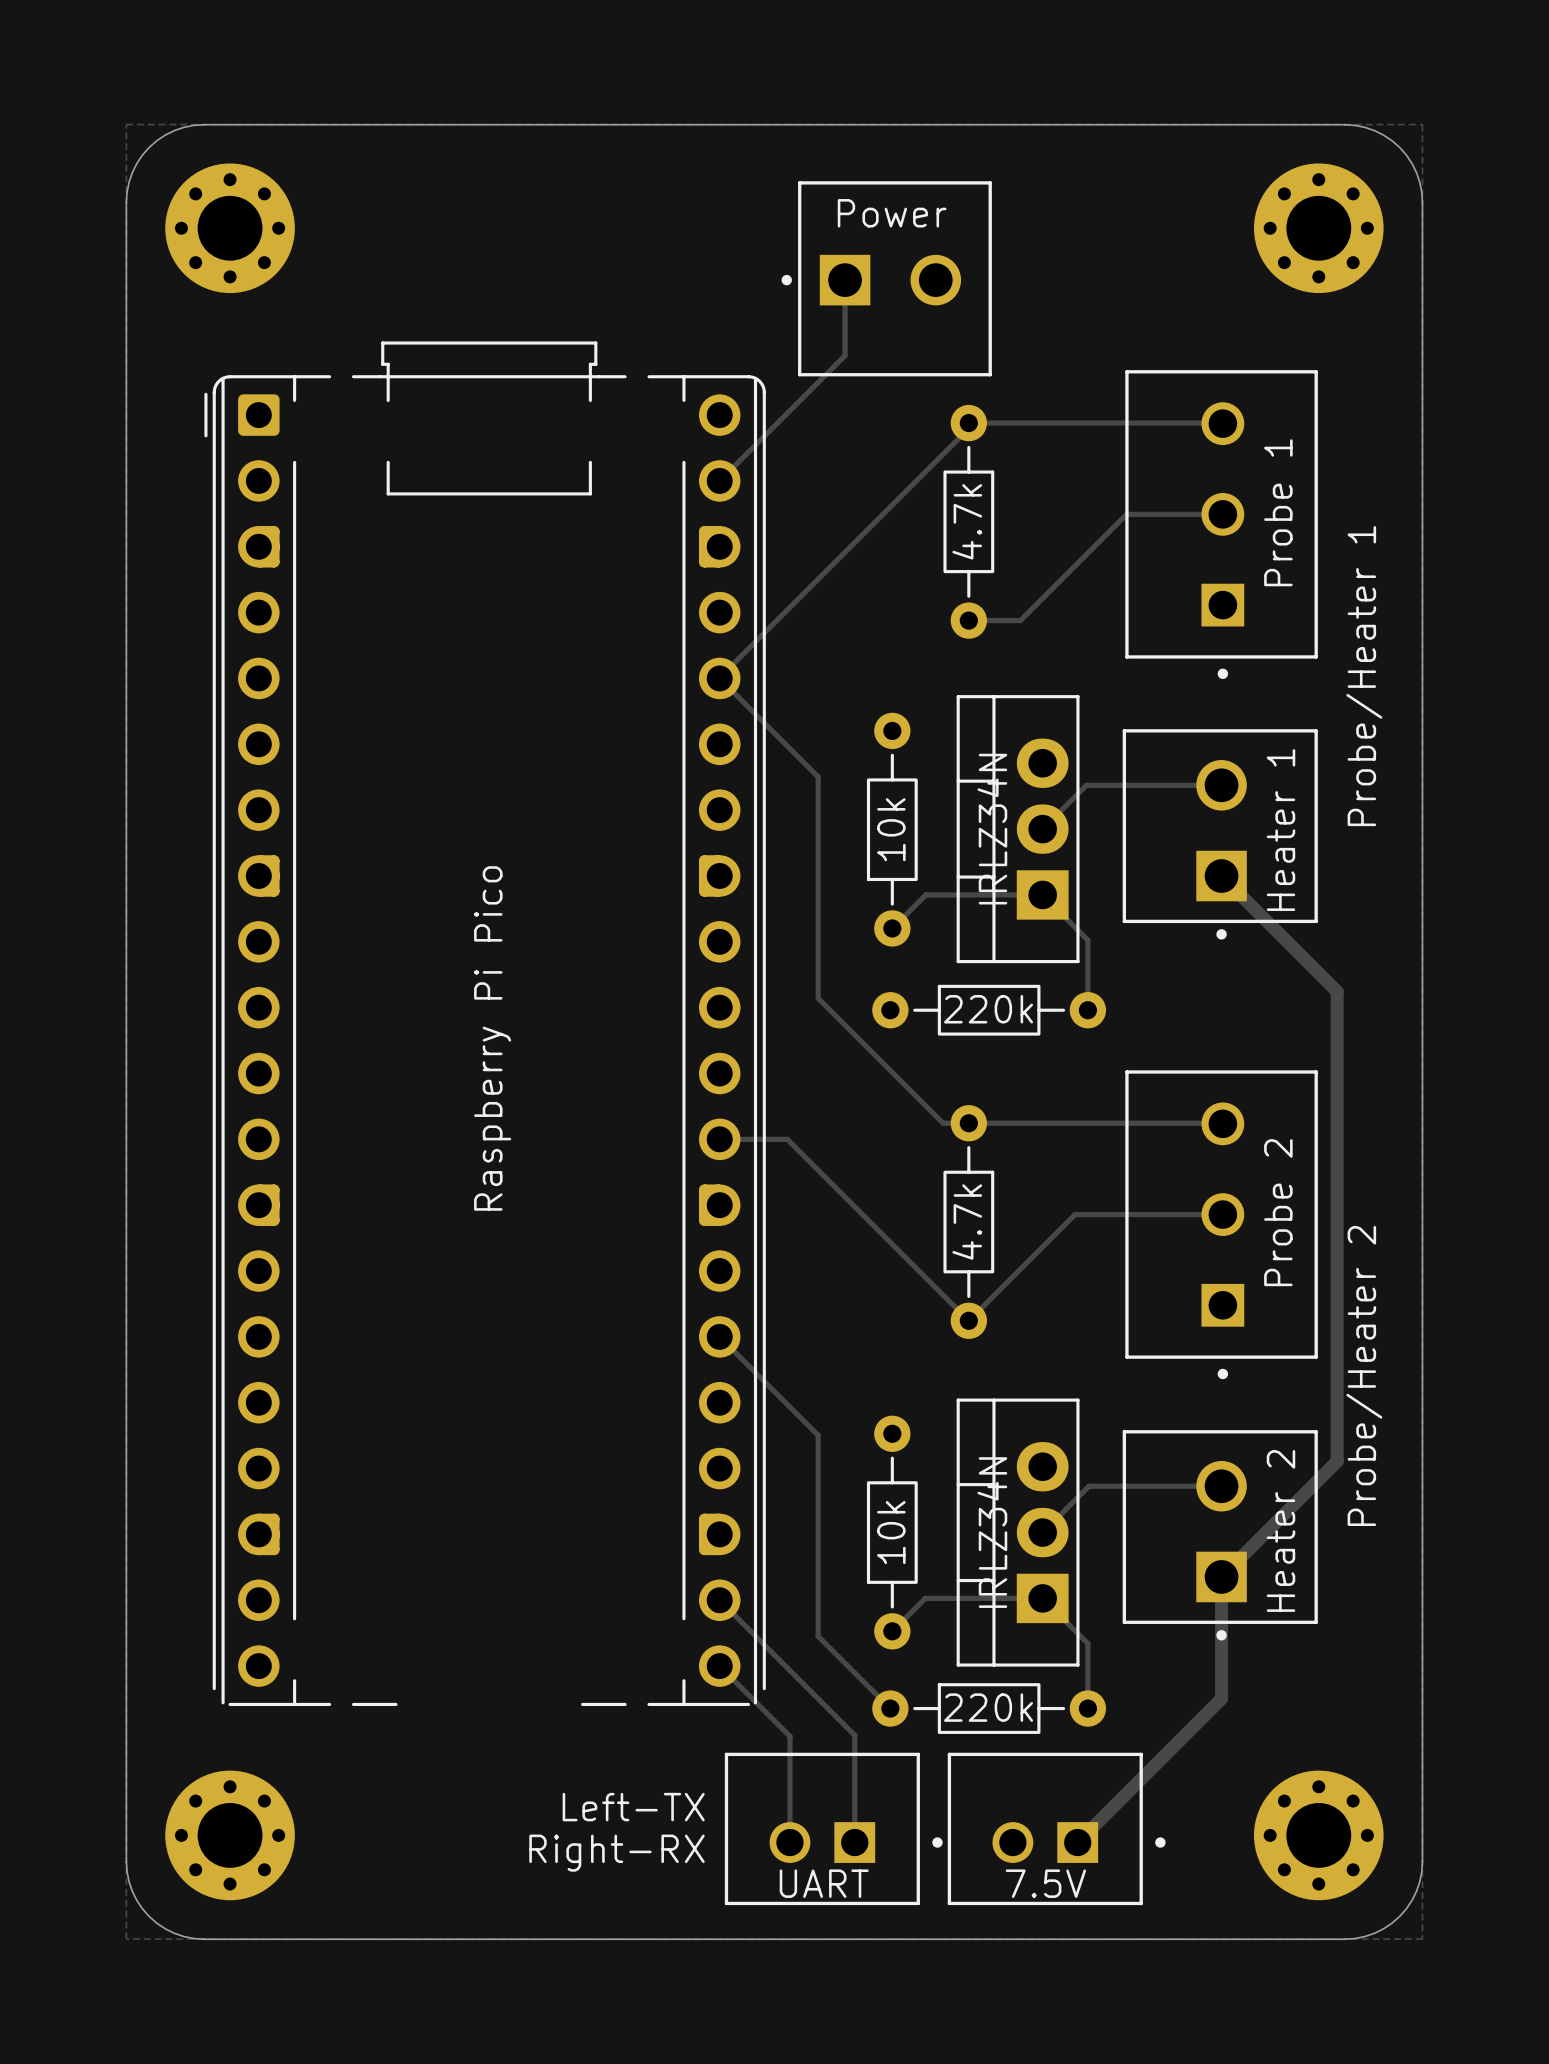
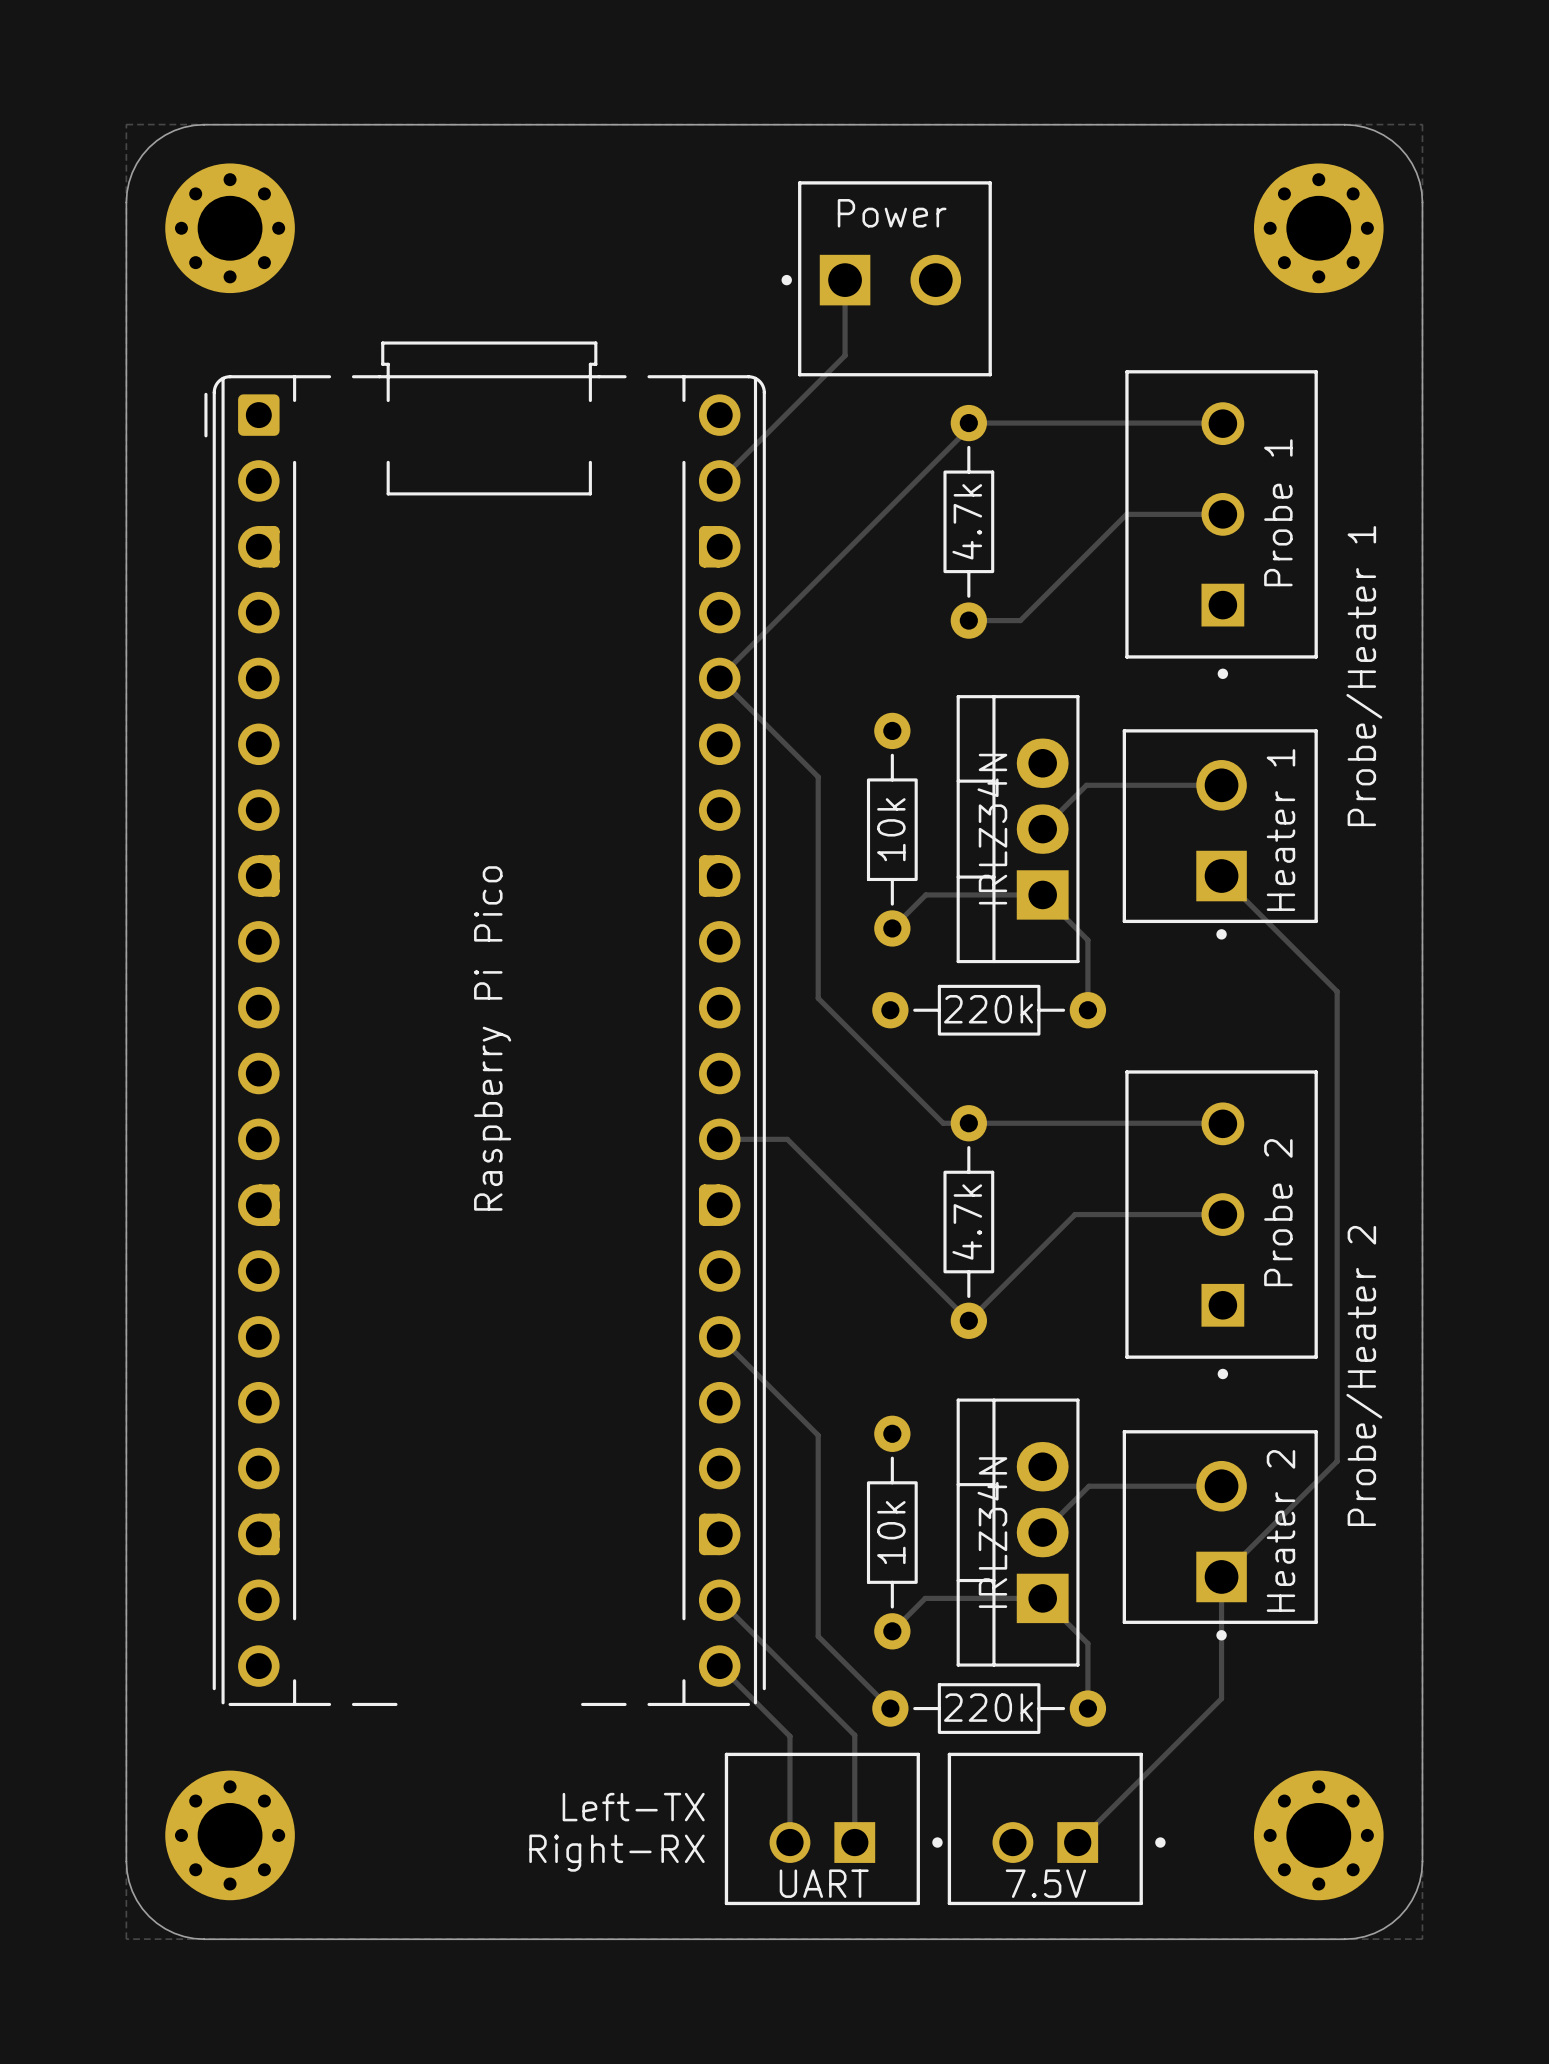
track width: thick (1221, 876) (1337, 991) (1337, 1461) (1221, 1576) (1221, 1698) (1077, 1842) -> thin (1221, 876) (1337, 991) (1337, 1461) (1221, 1576) (1221, 1698) (1077, 1842)

